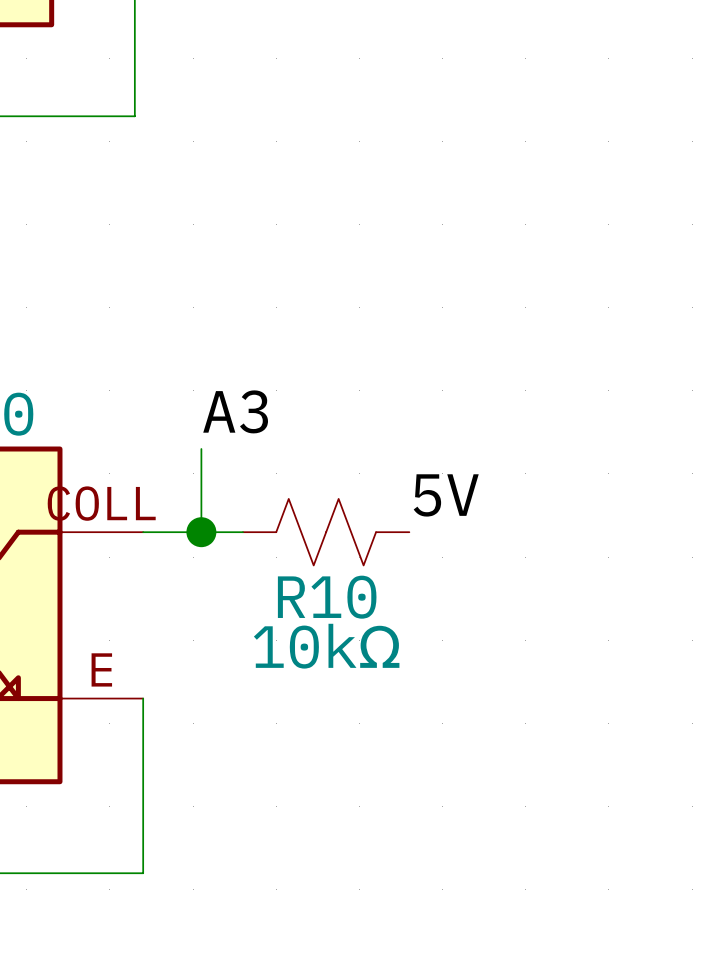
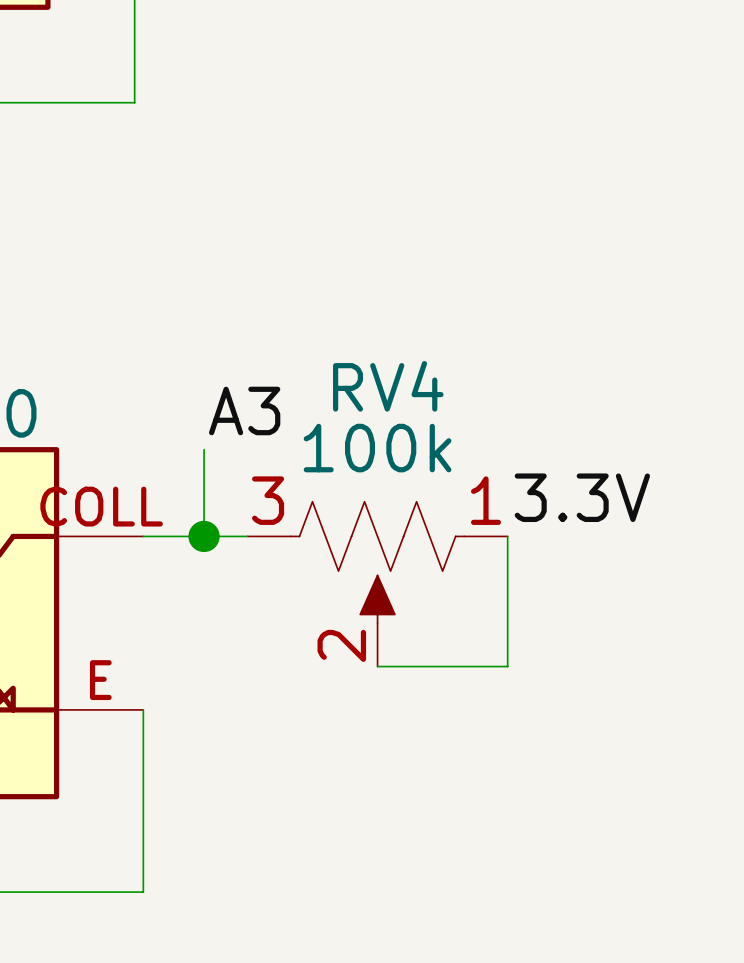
label: 5V (446, 495) -> none
label: none -> 3.3V (582, 497)
R10: 10kΩ (326, 532) -> none
wire: none -> (507, 536) (507, 666) (377, 666)
RV4: none -> 100k (377, 584)

